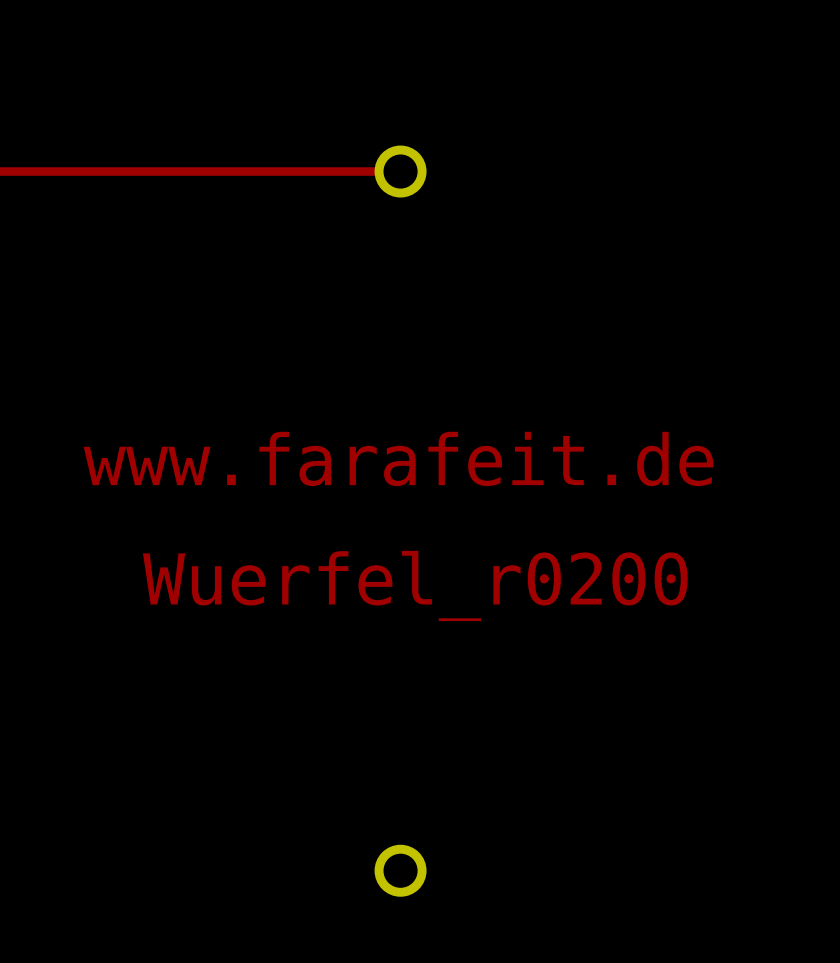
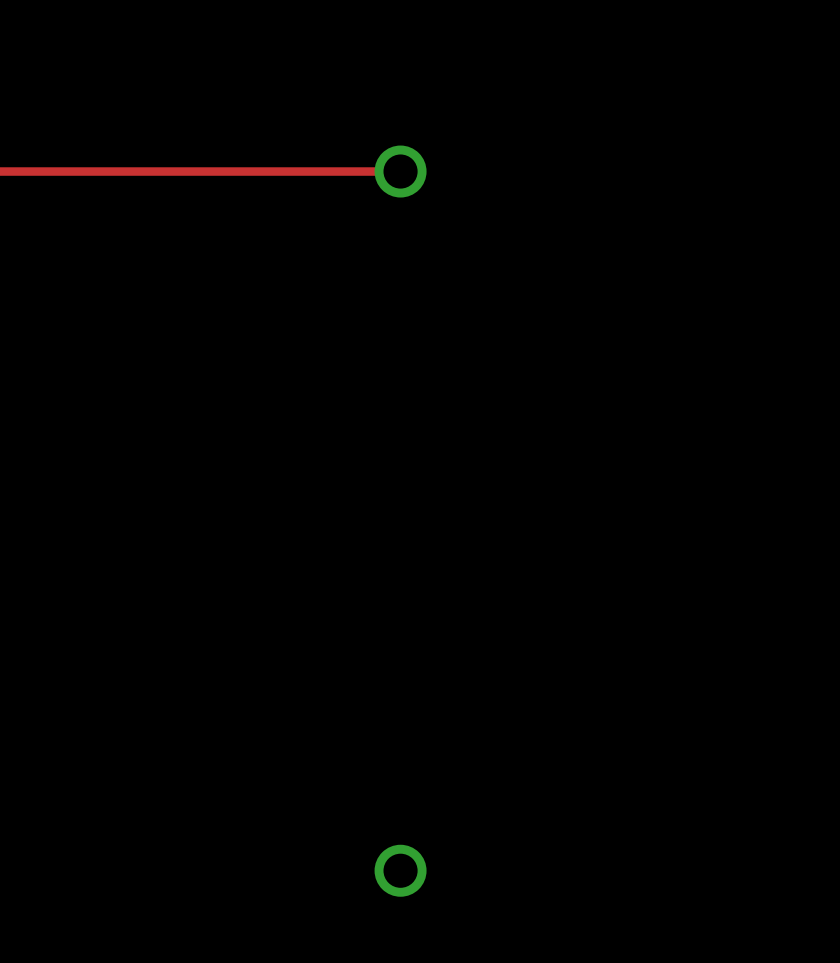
text: www.farafeit.de (398, 458) -> none
text: Wuerfel_r0200 (415, 585) -> none

